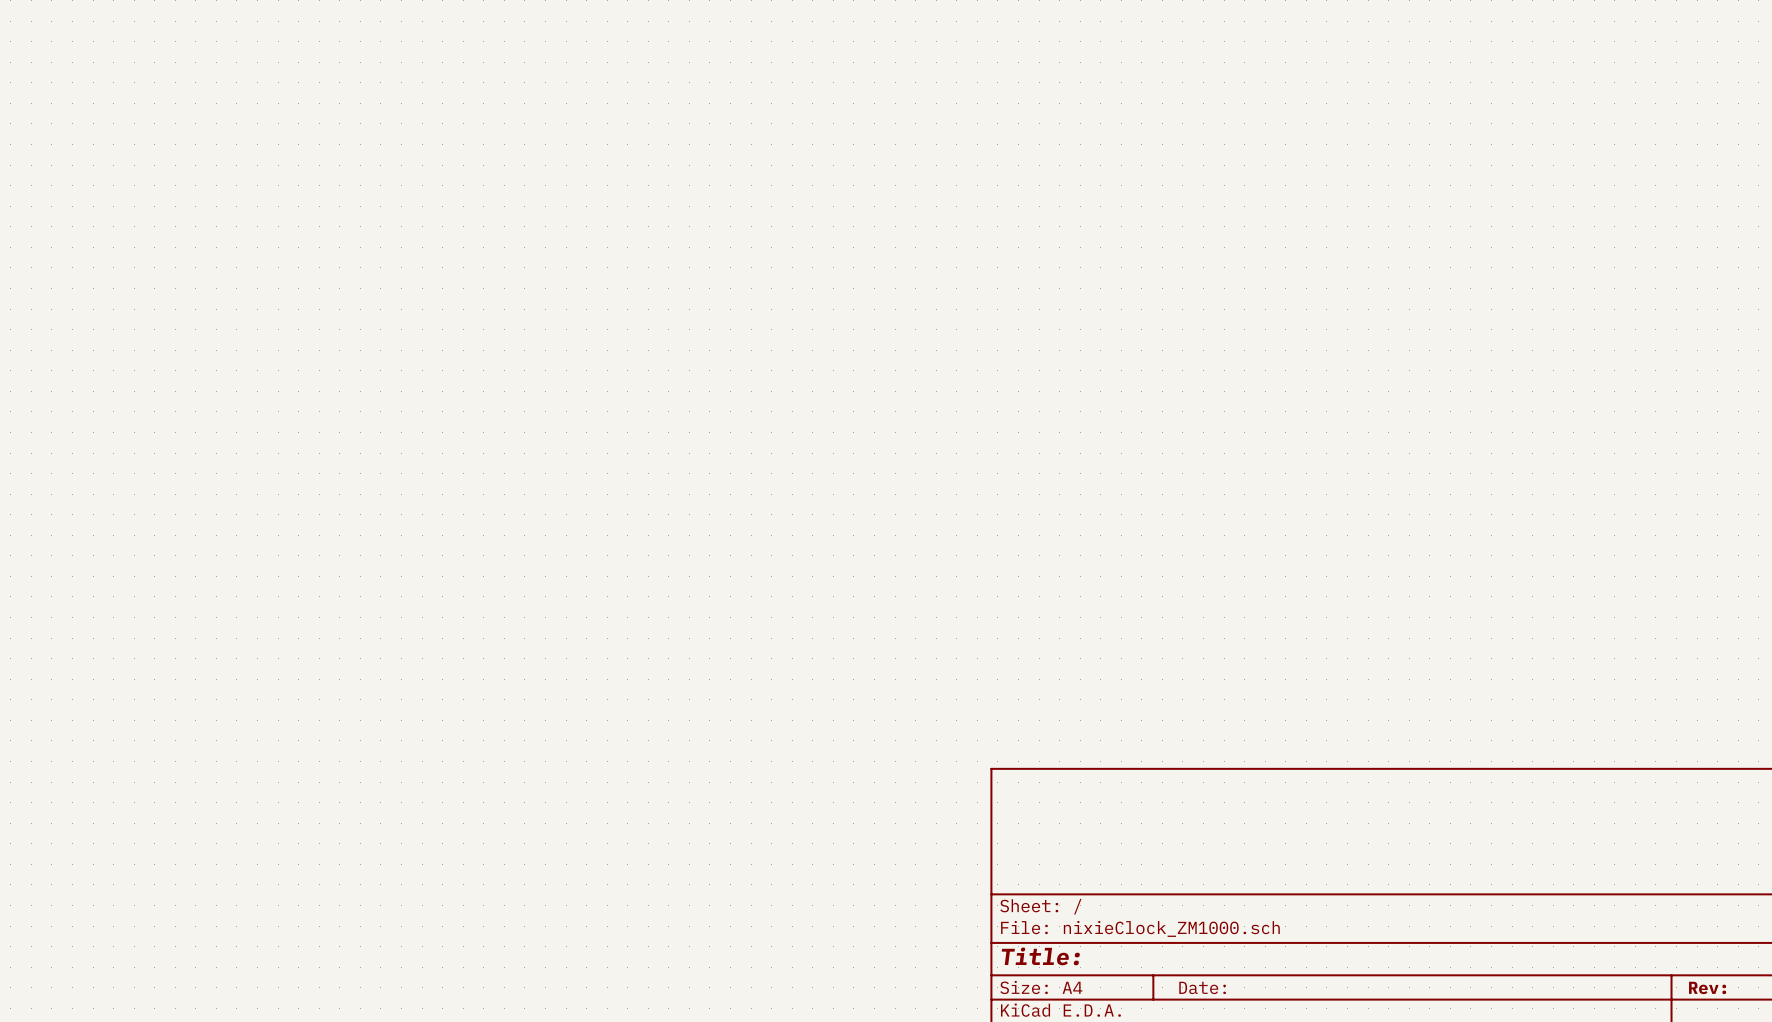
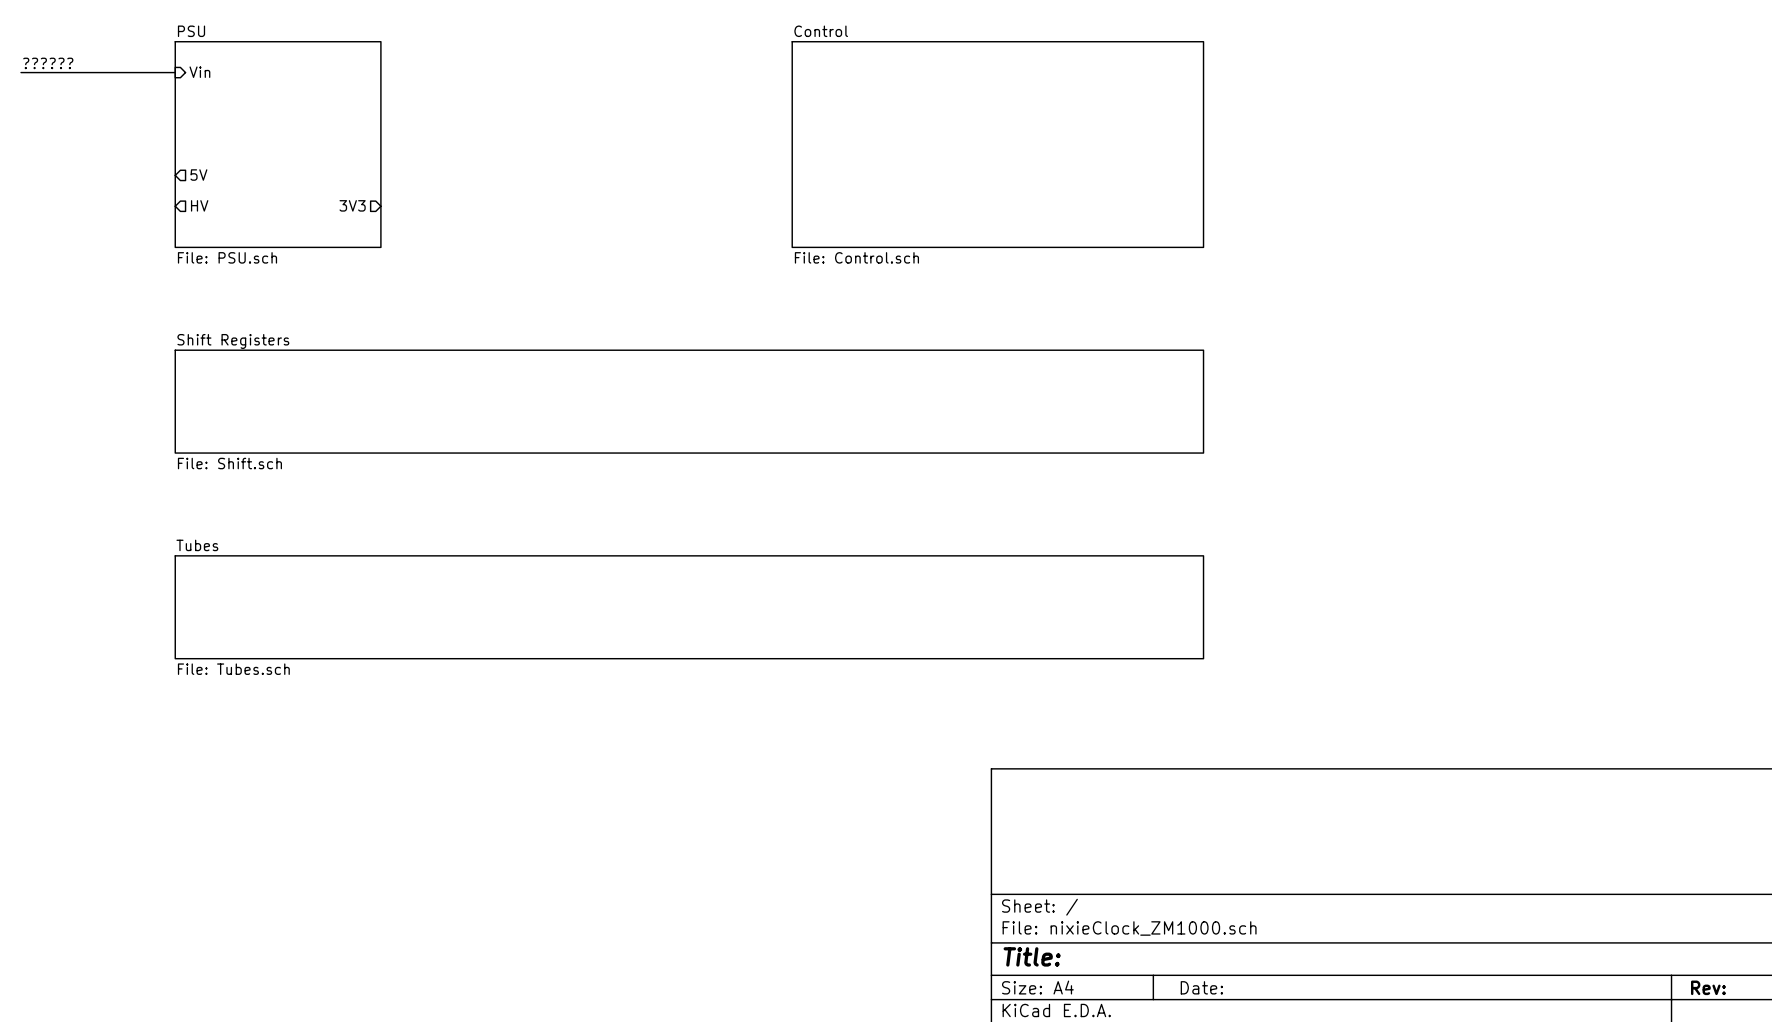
label: none -> ?????? (48, 63)
sheet pin: none -> Vin (199, 72)
wire: none -> (21, 72) (175, 72)
sheet PSU: none -> File: PSU.sch (278, 144)
sheet Control: none -> File: Control.sch (997, 144)
sheet pin: none -> 5V (198, 175)
sheet pin: none -> HV (199, 205)
sheet pin: none -> 3V3 (352, 205)
sheet Shift Registers: none -> File: Shift.sch (689, 401)
sheet Tubes: none -> File: Tubes.sch (689, 607)

